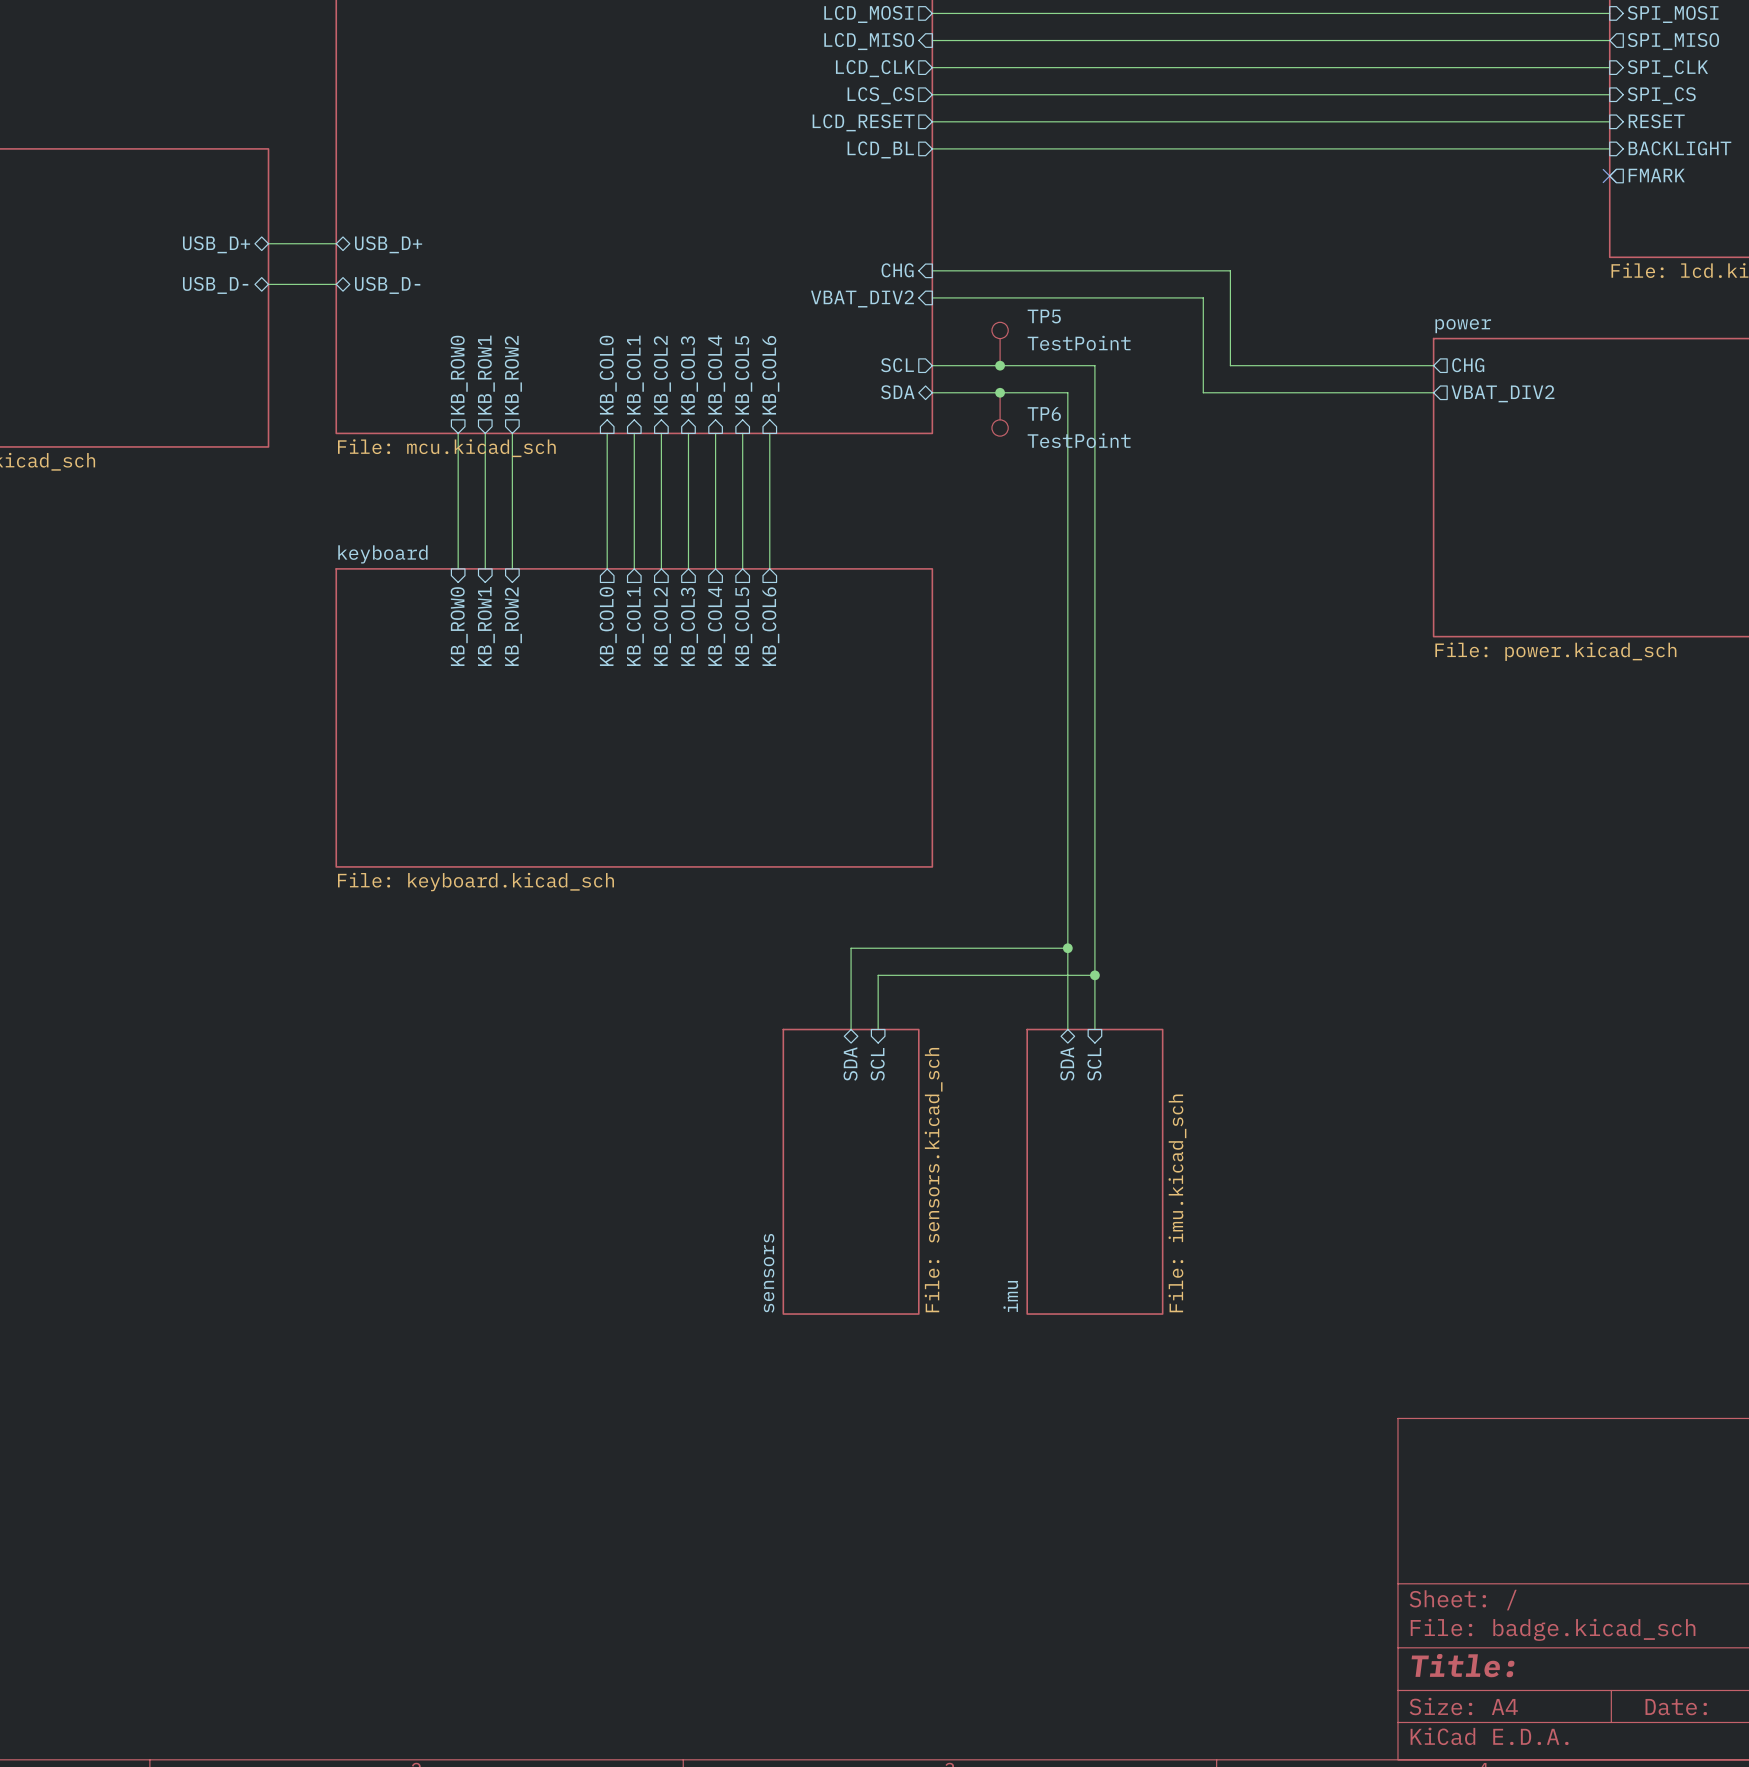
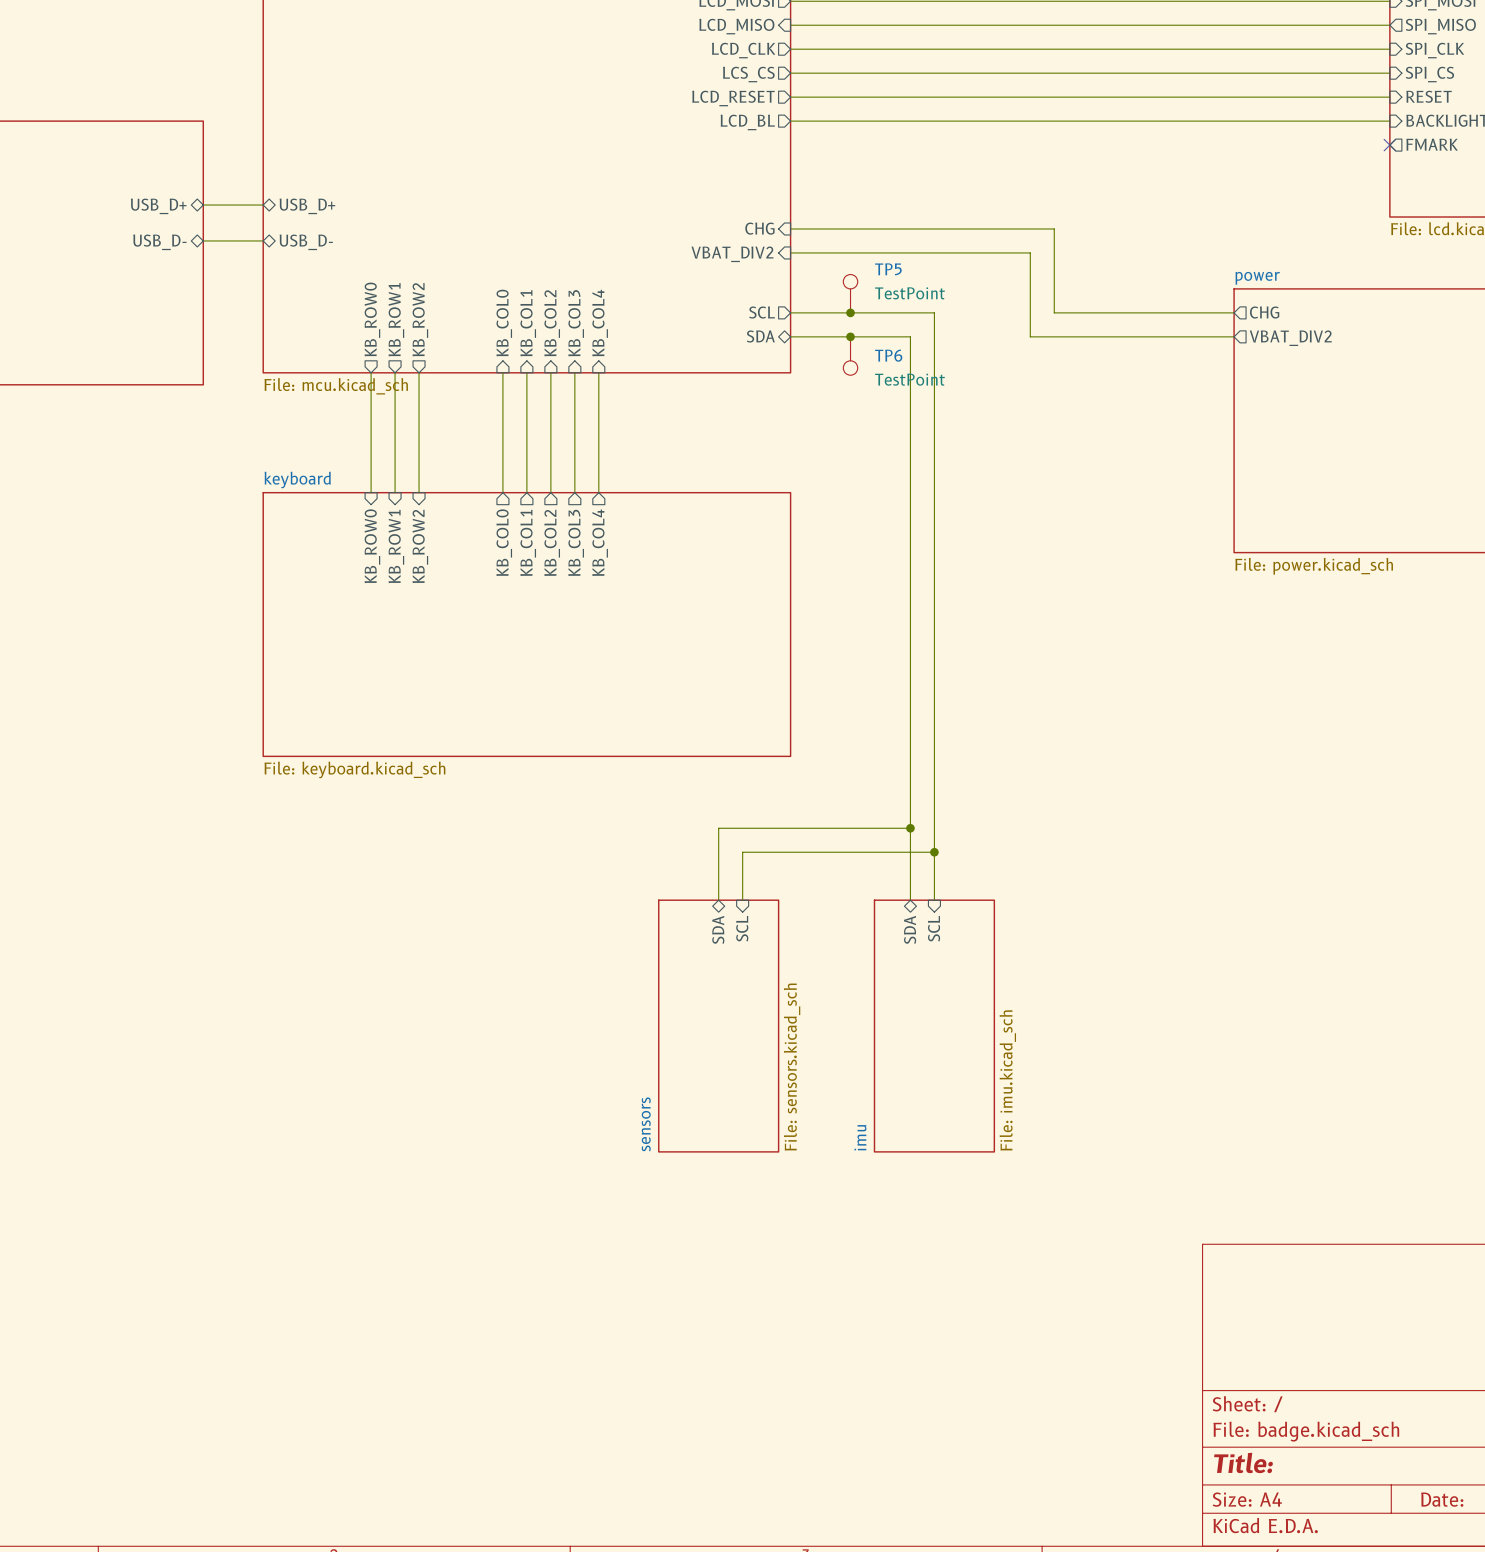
sheet pin: KB_COL5 (743, 375) -> none
sheet pin: KB_COL6 (770, 375) -> none
wire: (742, 433) (742, 568) -> none
wire: (769, 433) (769, 568) -> none
sheet pin: KB_COL5 (743, 626) -> none
sheet pin: KB_COL6 (770, 626) -> none

